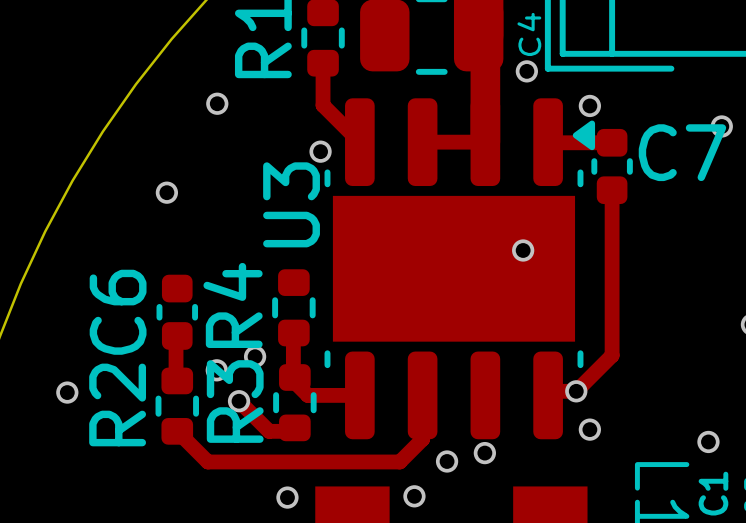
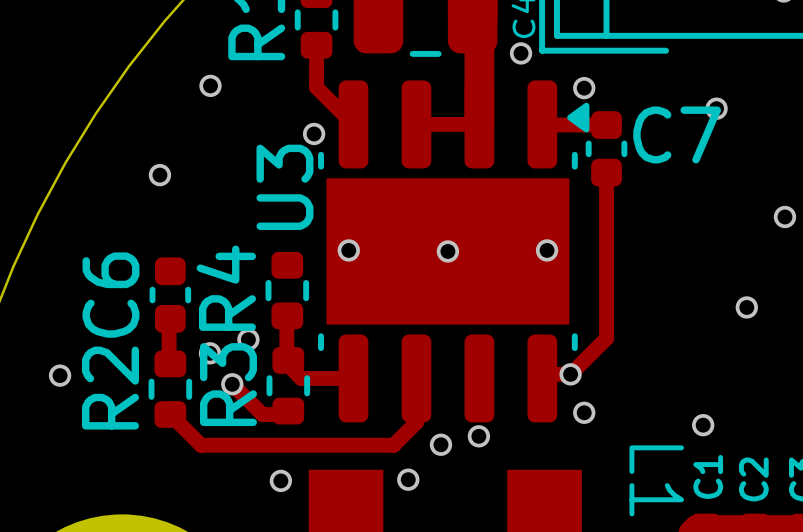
via position: (523, 250) -> (547, 250)
via: none -> (348, 250)
via: none -> (447, 251)

